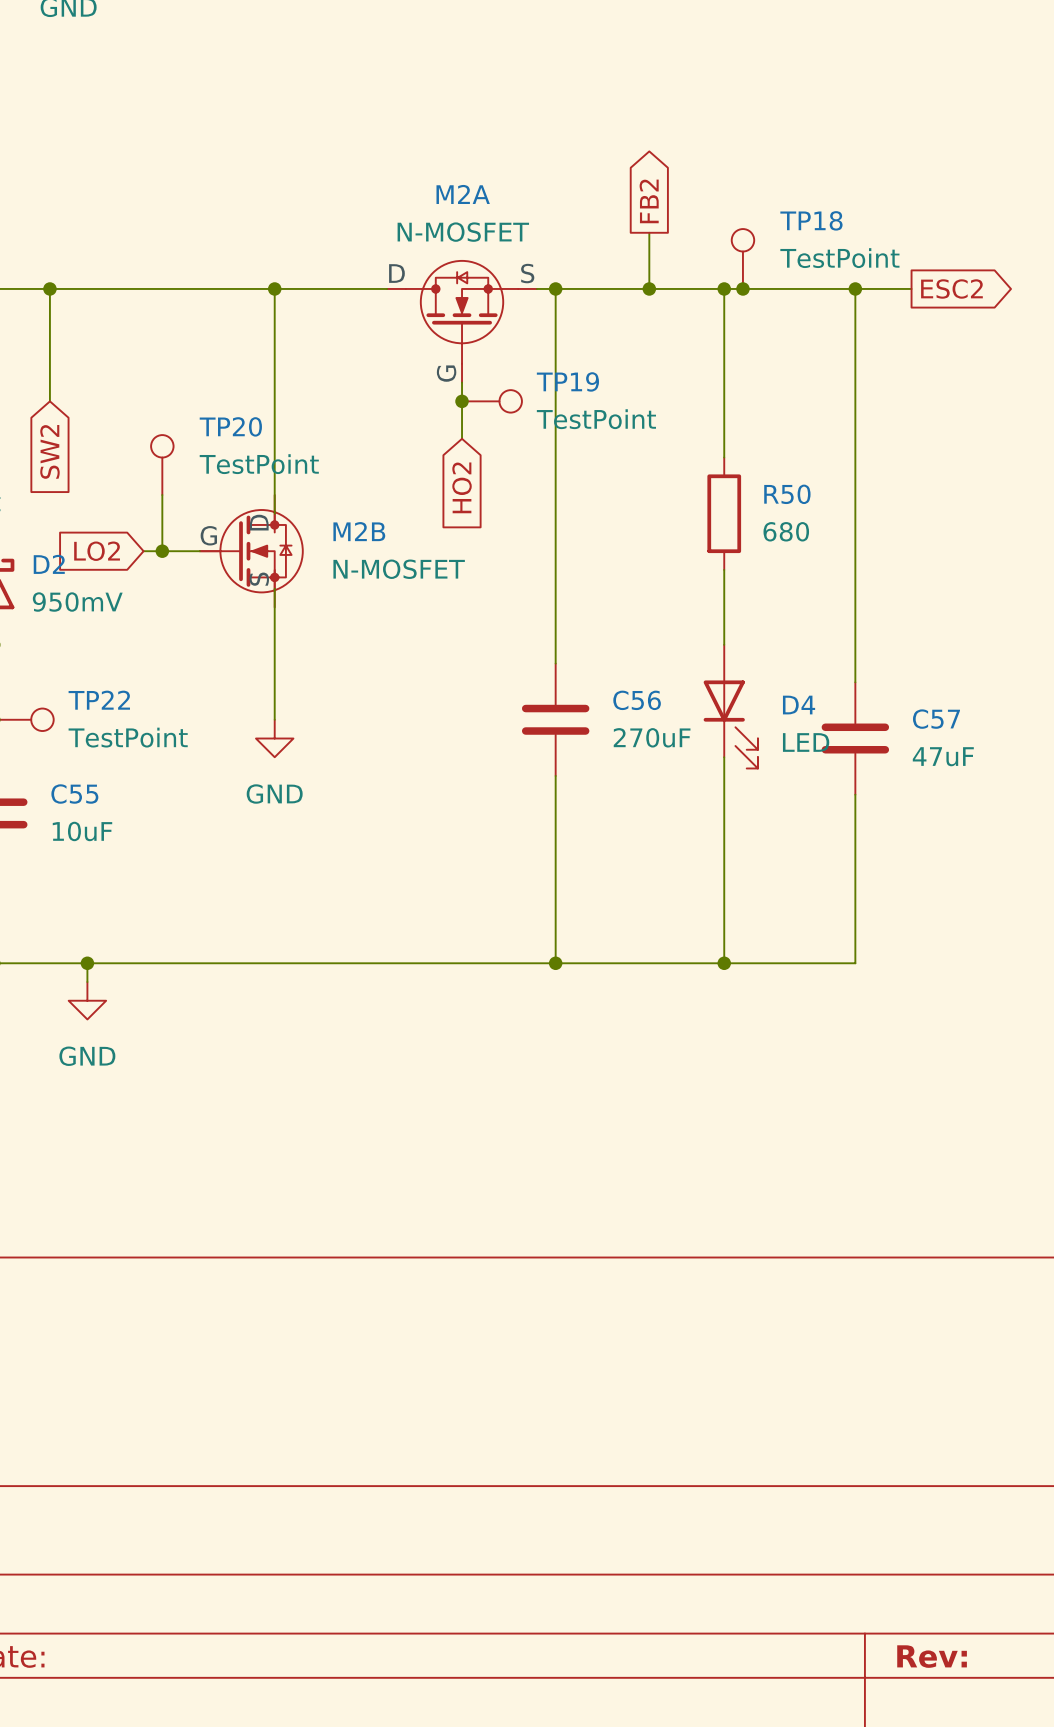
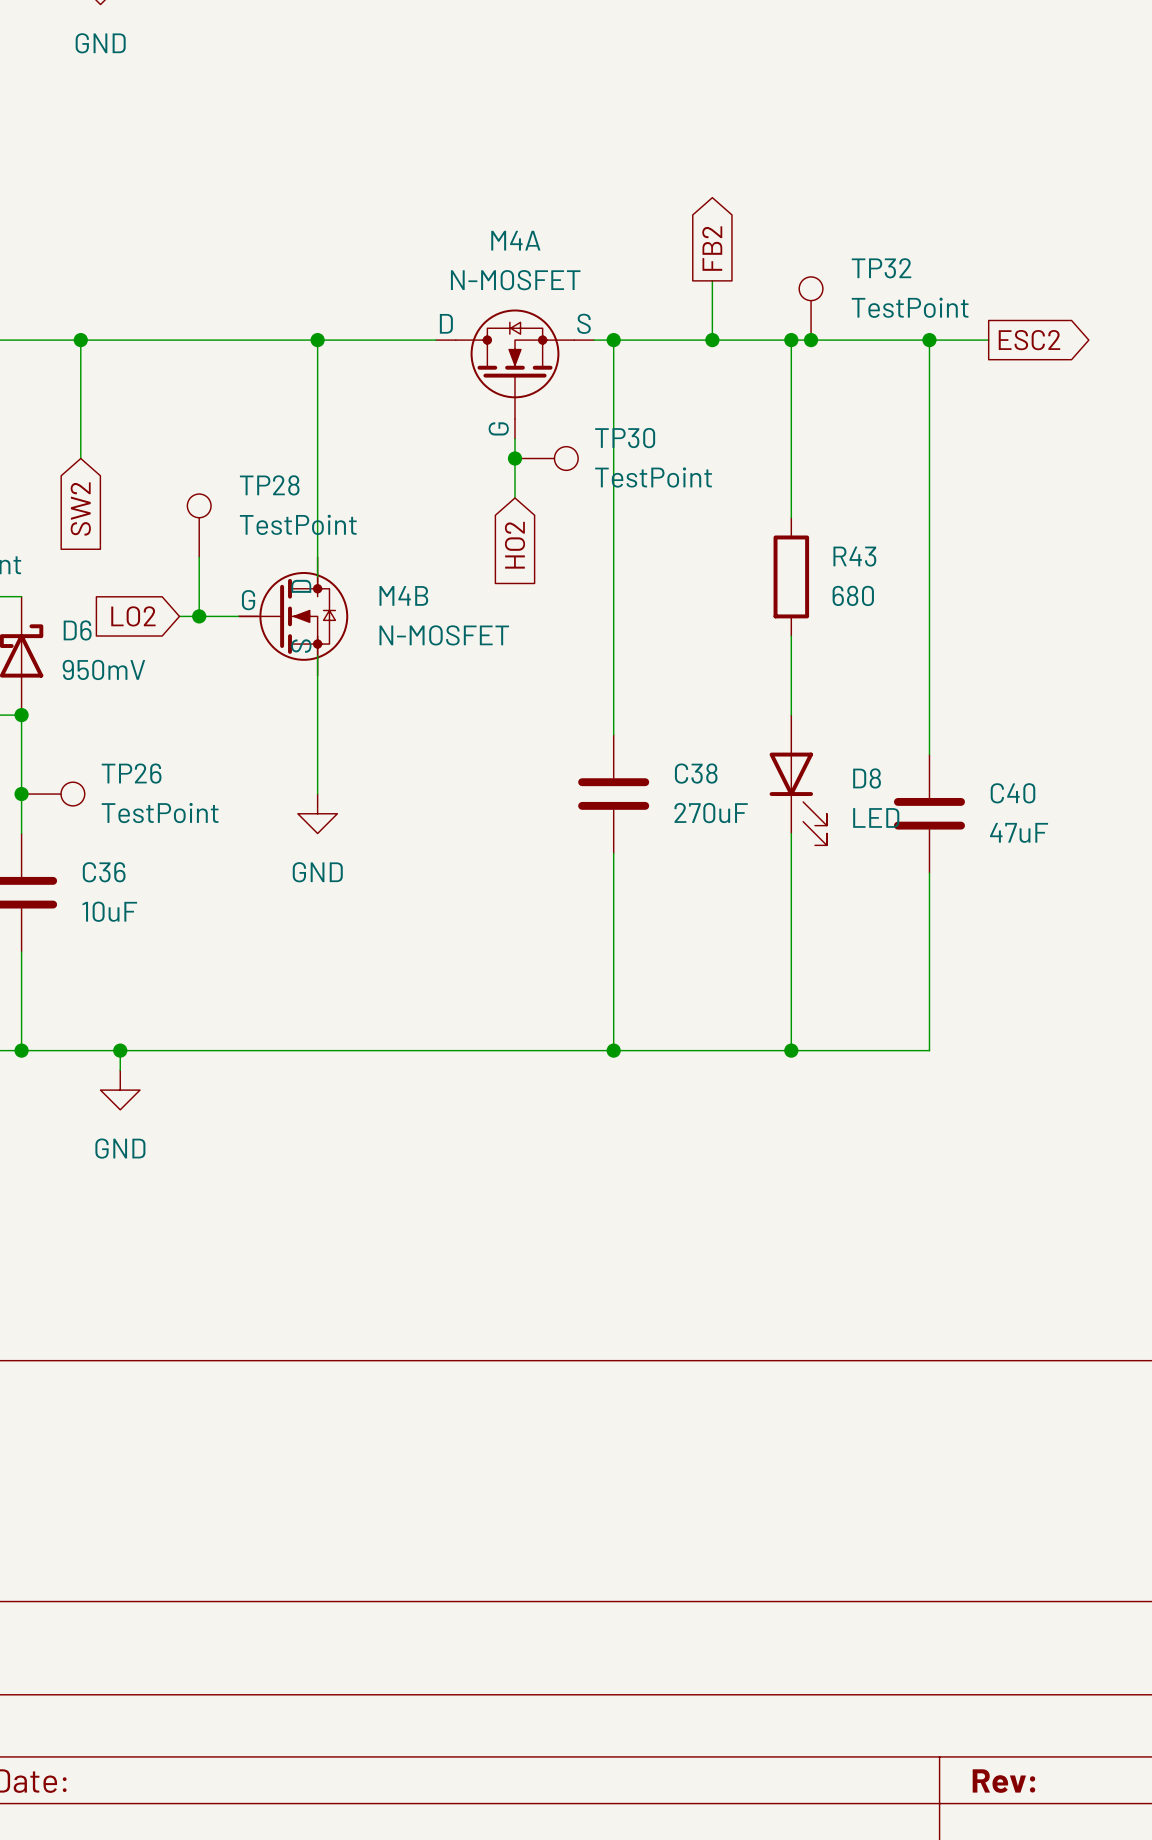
M2A name: M2A (463, 194) -> M4A (515, 240)
TP18 name: TP18 (811, 220) -> TP32 (881, 268)
TP19 name: TP19 (567, 381) -> TP30 (625, 438)
TP20 name: TP20 (230, 426) -> TP28 (269, 485)
R50 name: R50 (787, 494) -> R43 (854, 556)
M2B name: M2B (359, 531) -> M4B (403, 595)
D2 name: D2 (49, 564) -> D6 (77, 630)
TP22 name: TP22 (99, 700) -> TP26 (131, 773)
C56 name: C56 (637, 700) -> C38 (696, 773)
D4 name: D4 (799, 705) -> D8 (867, 778)
C57 name: C57 (936, 719) -> C40 (1012, 793)
C55 name: C55 (74, 794) -> C36 (104, 872)

